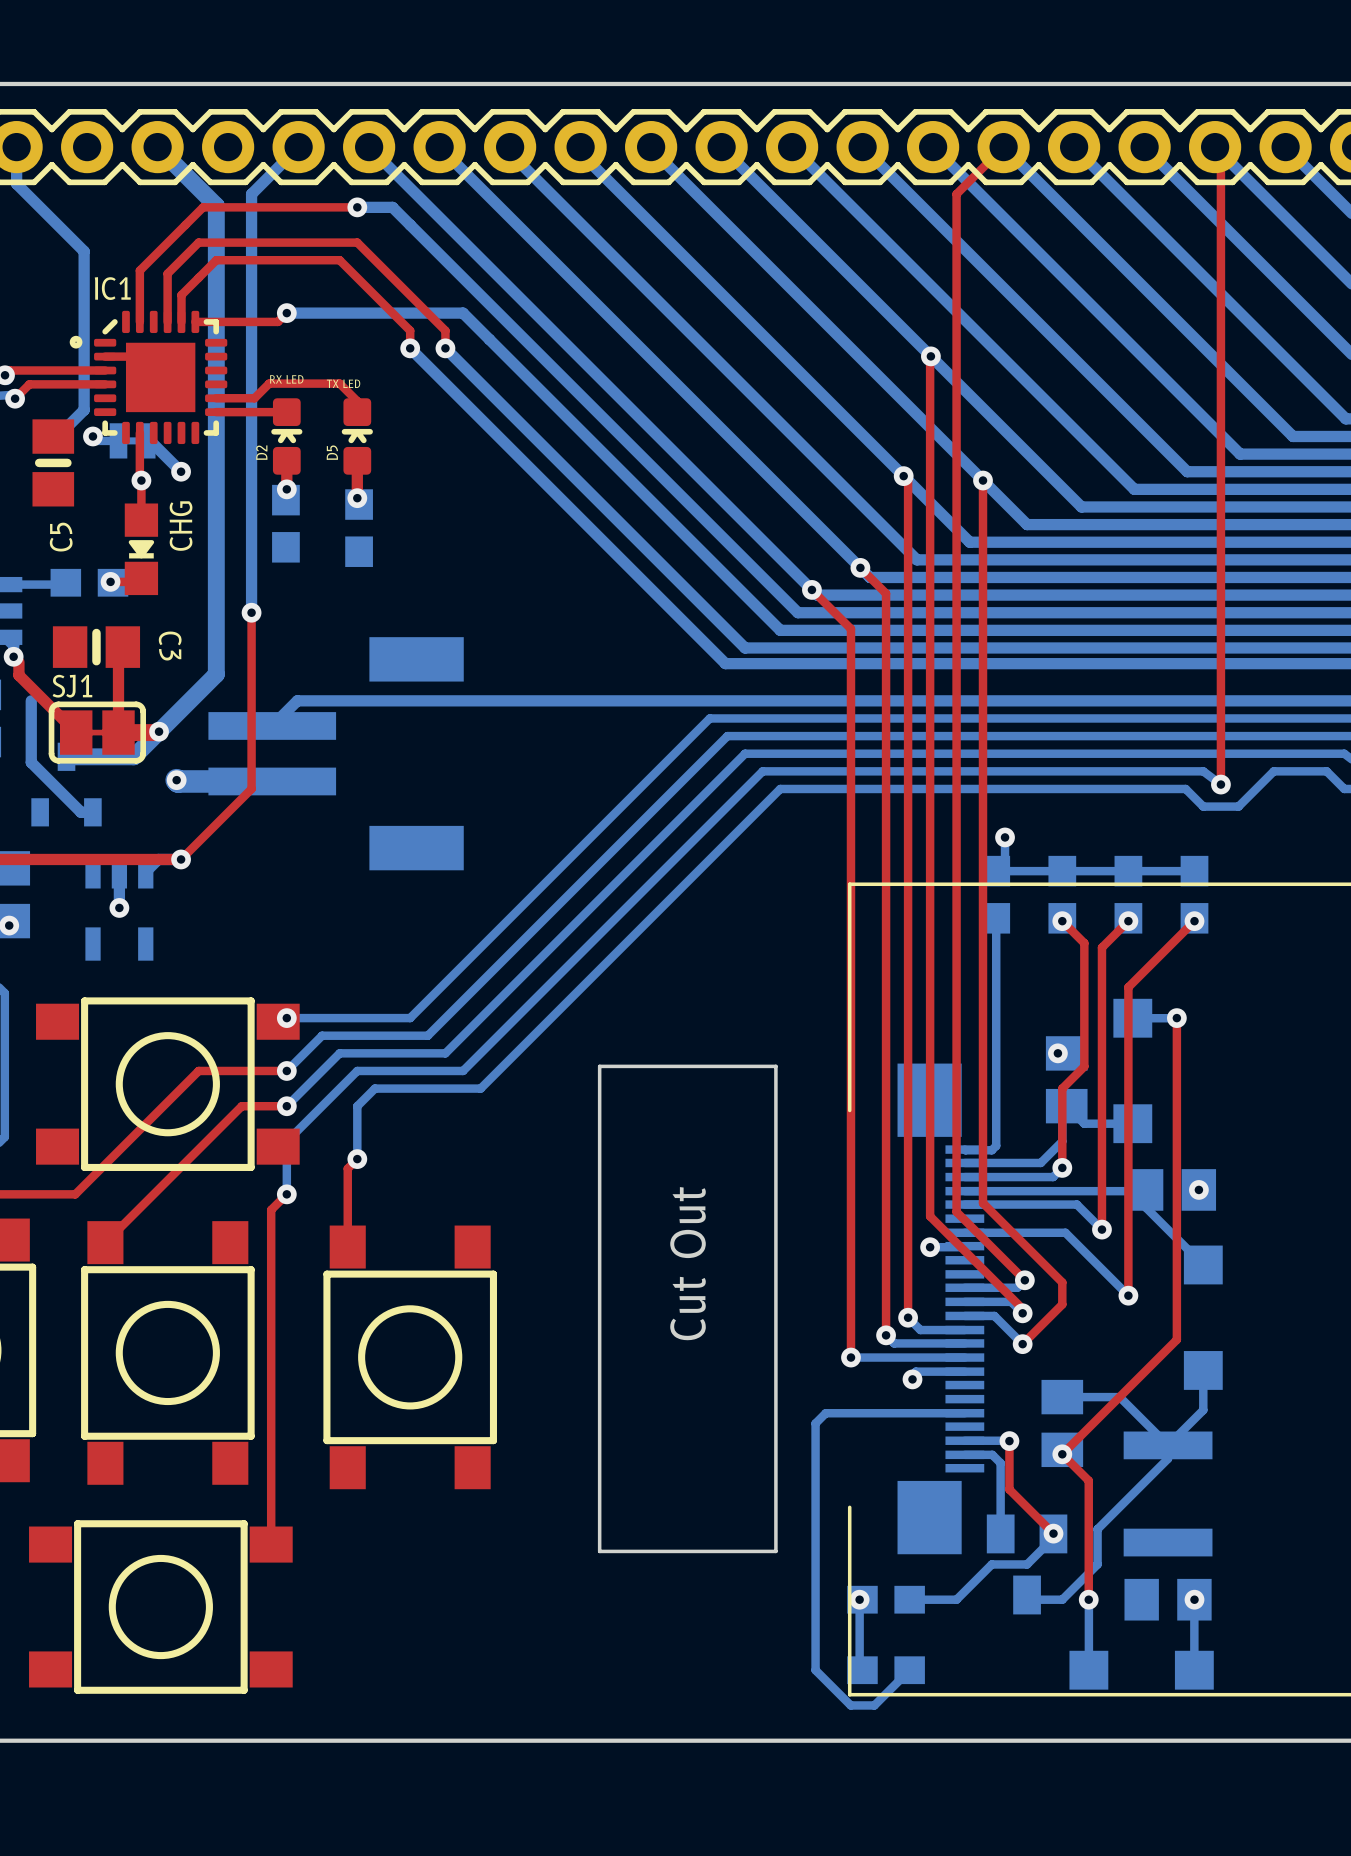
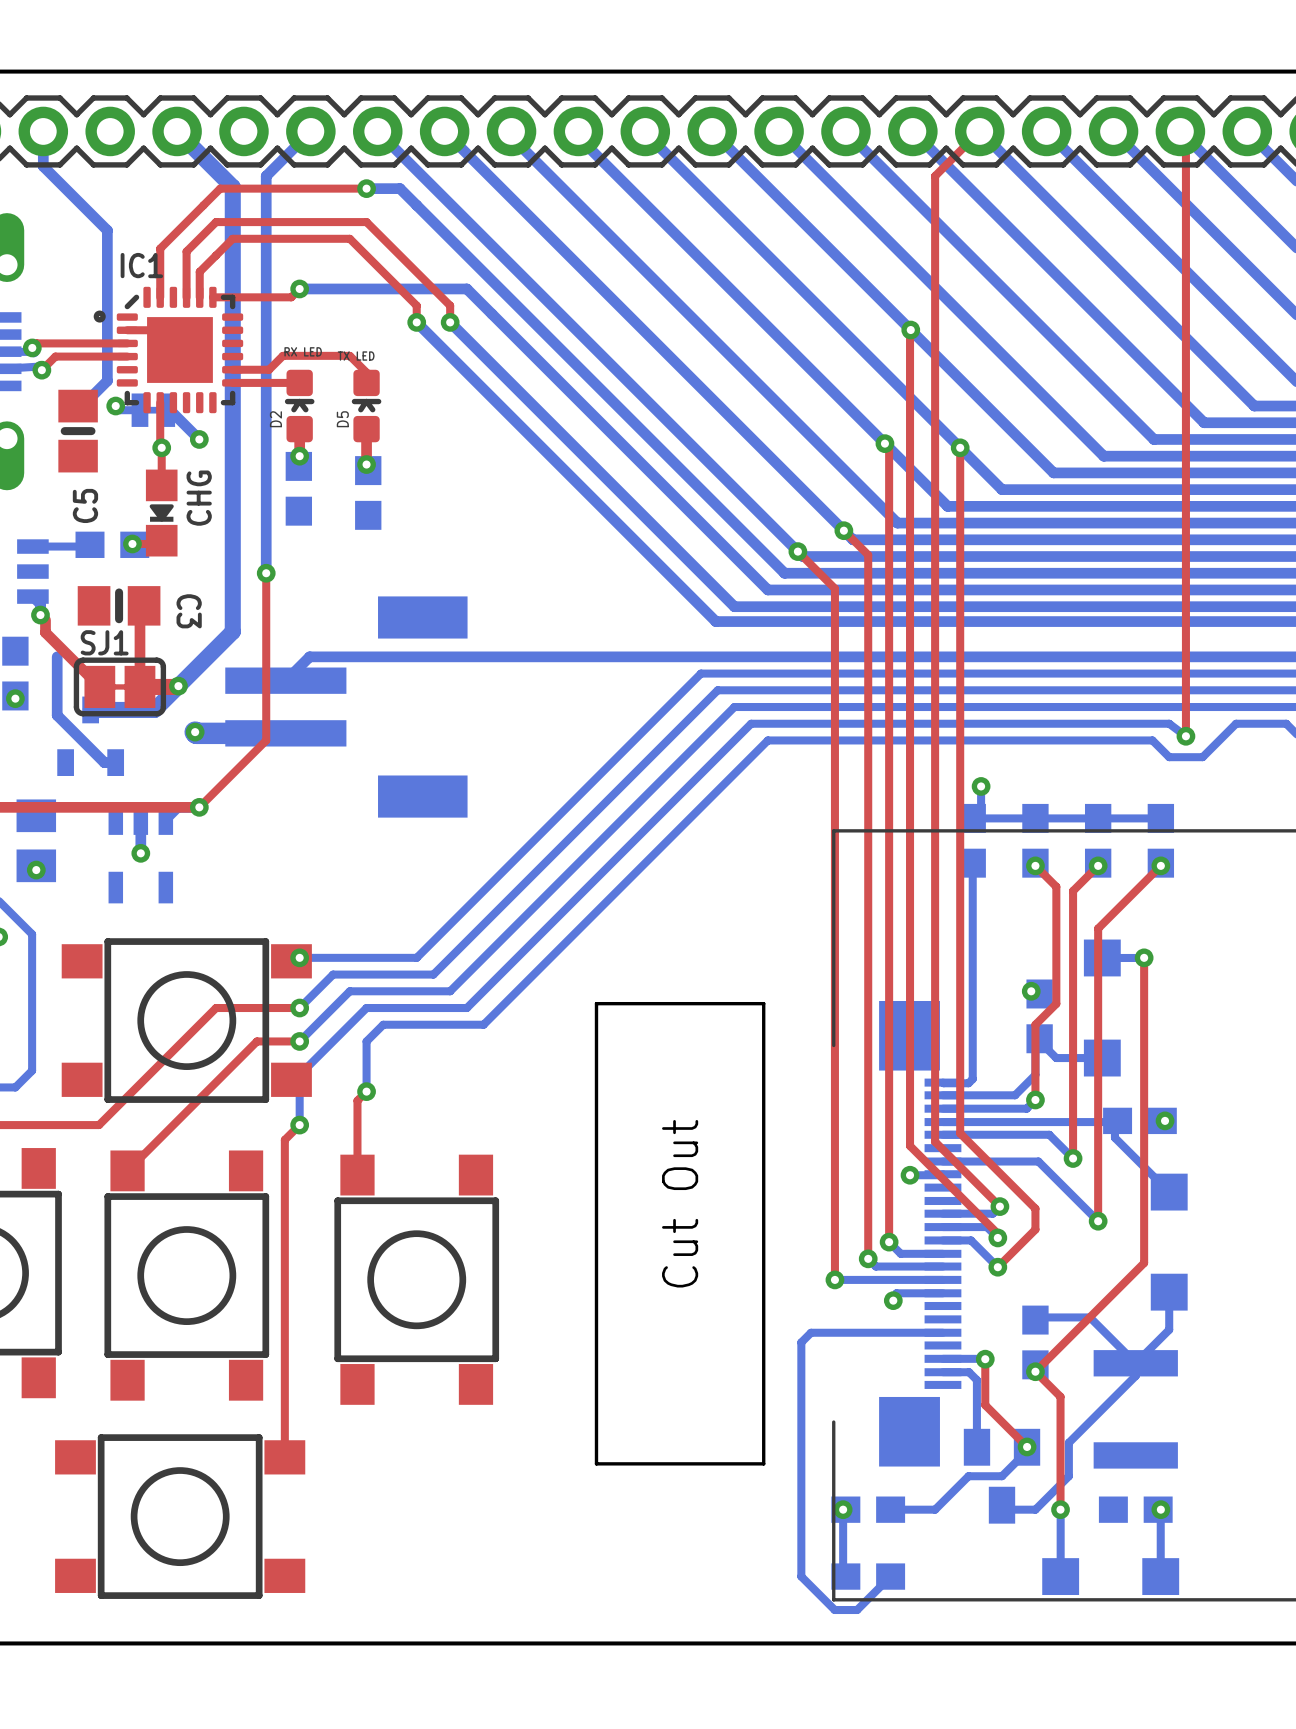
part footprint: [1045, 1036, 1088, 1124] -> [1026, 979, 1053, 1054]
part footprint: [1128, 1169, 1217, 1211] -> [1103, 1107, 1177, 1135]
part footprint: [1041, 1379, 1084, 1468] -> [1022, 1305, 1049, 1380]
part footprint: [1124, 1578, 1212, 1621] -> [1098, 1496, 1173, 1523]

